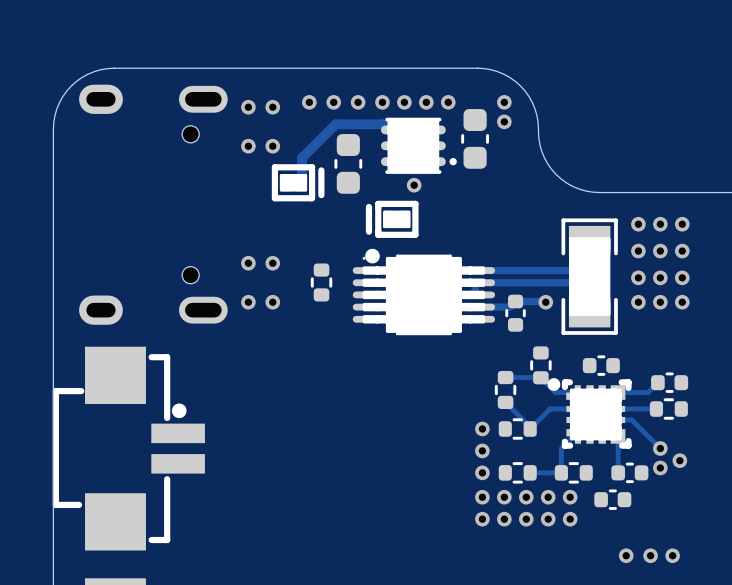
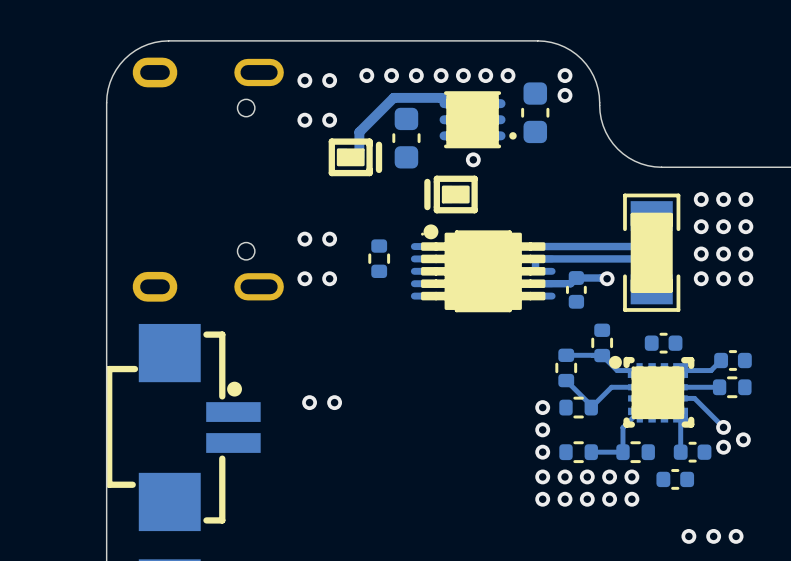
via: none -> (309, 402)
via: none -> (334, 402)

